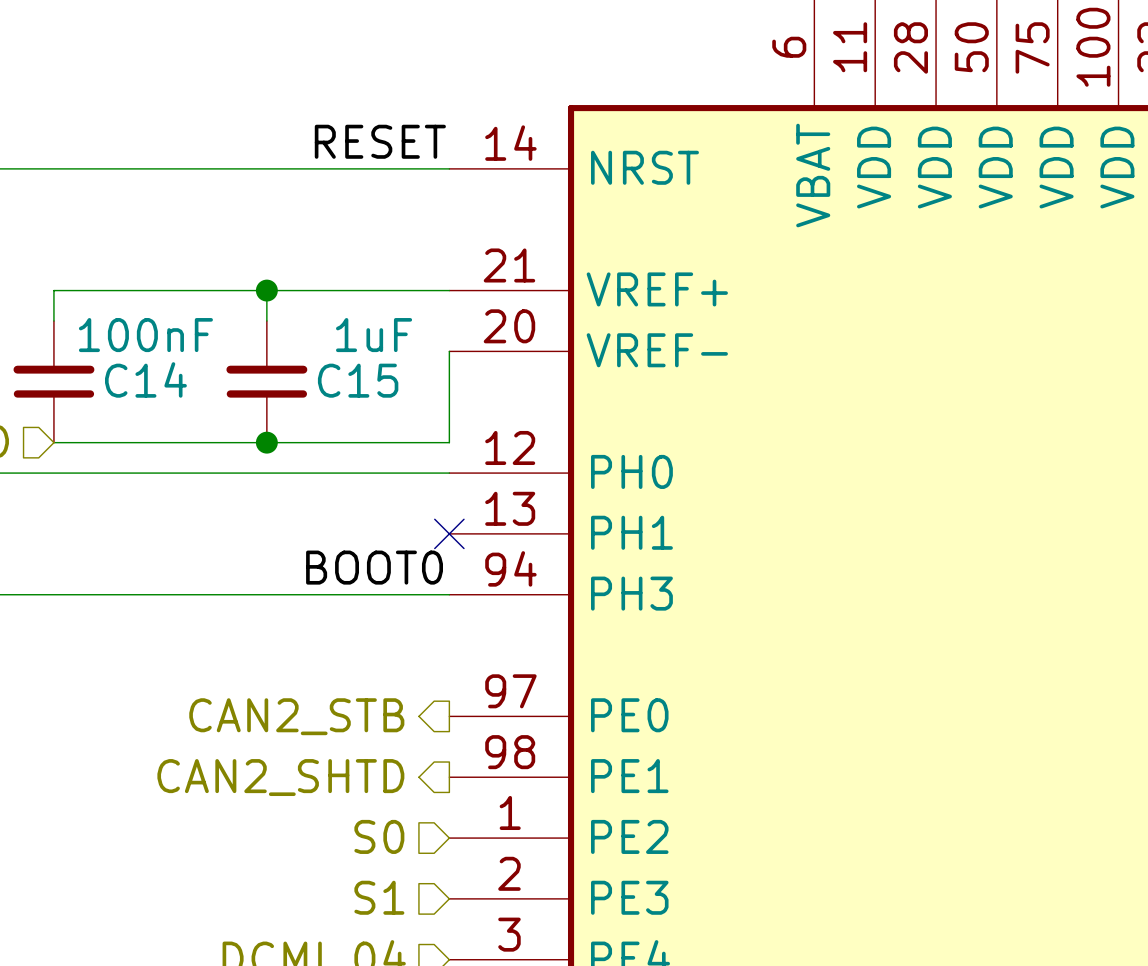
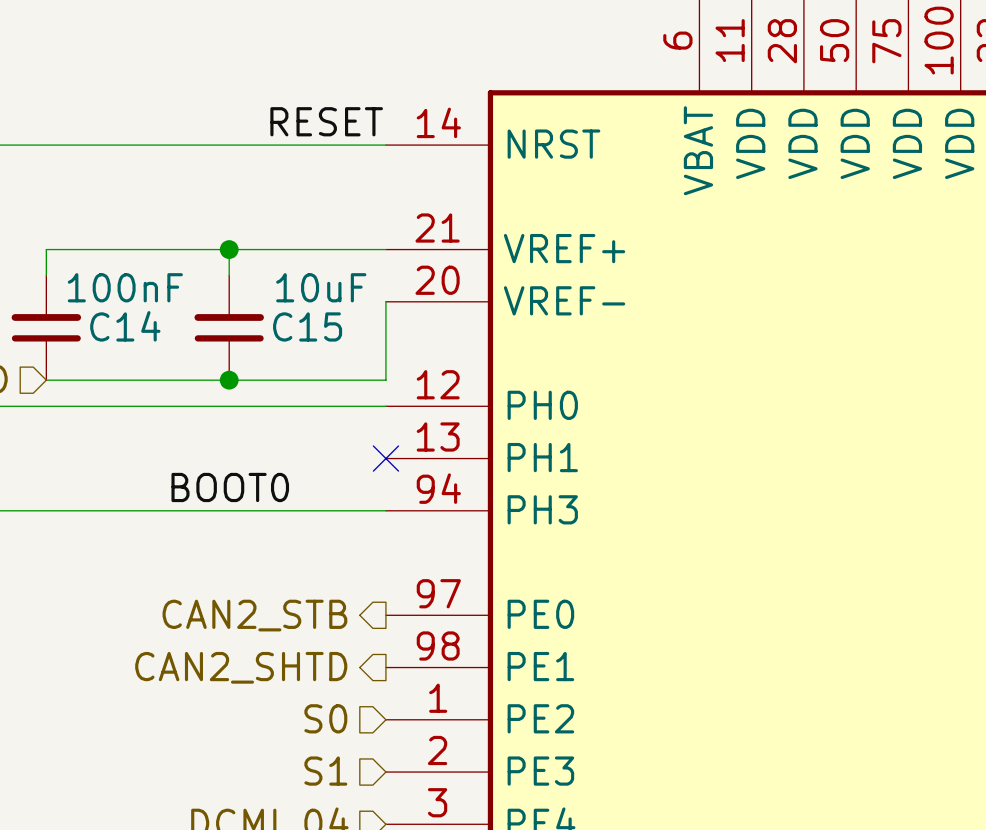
C15 value: 1uF (374, 335) -> 10uF (321, 287)
label position: BOOT0 (374, 567) -> BOOT0 (230, 487)

